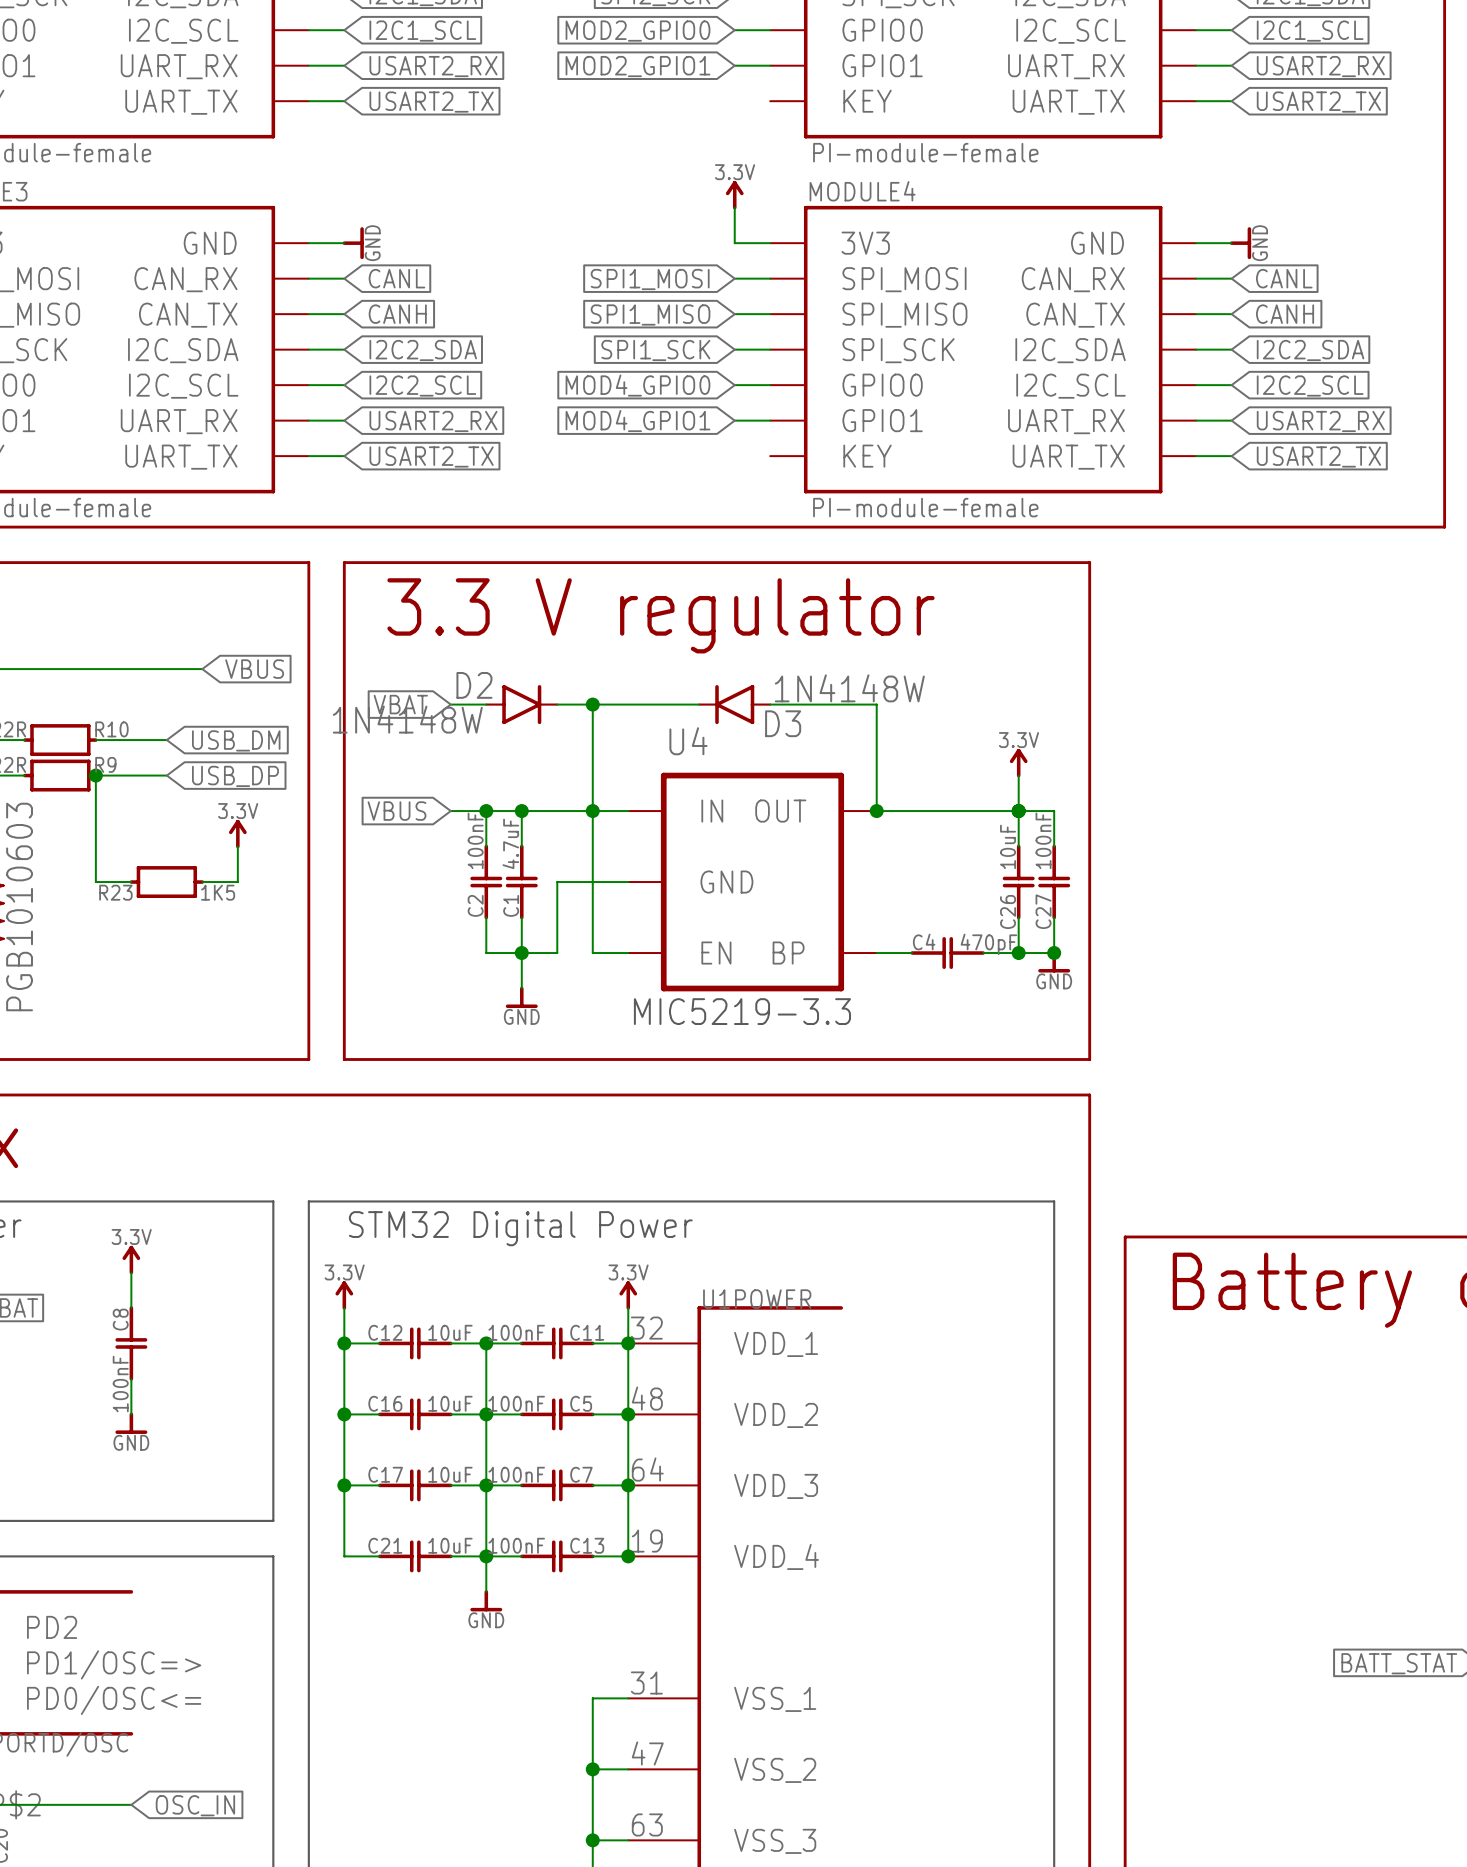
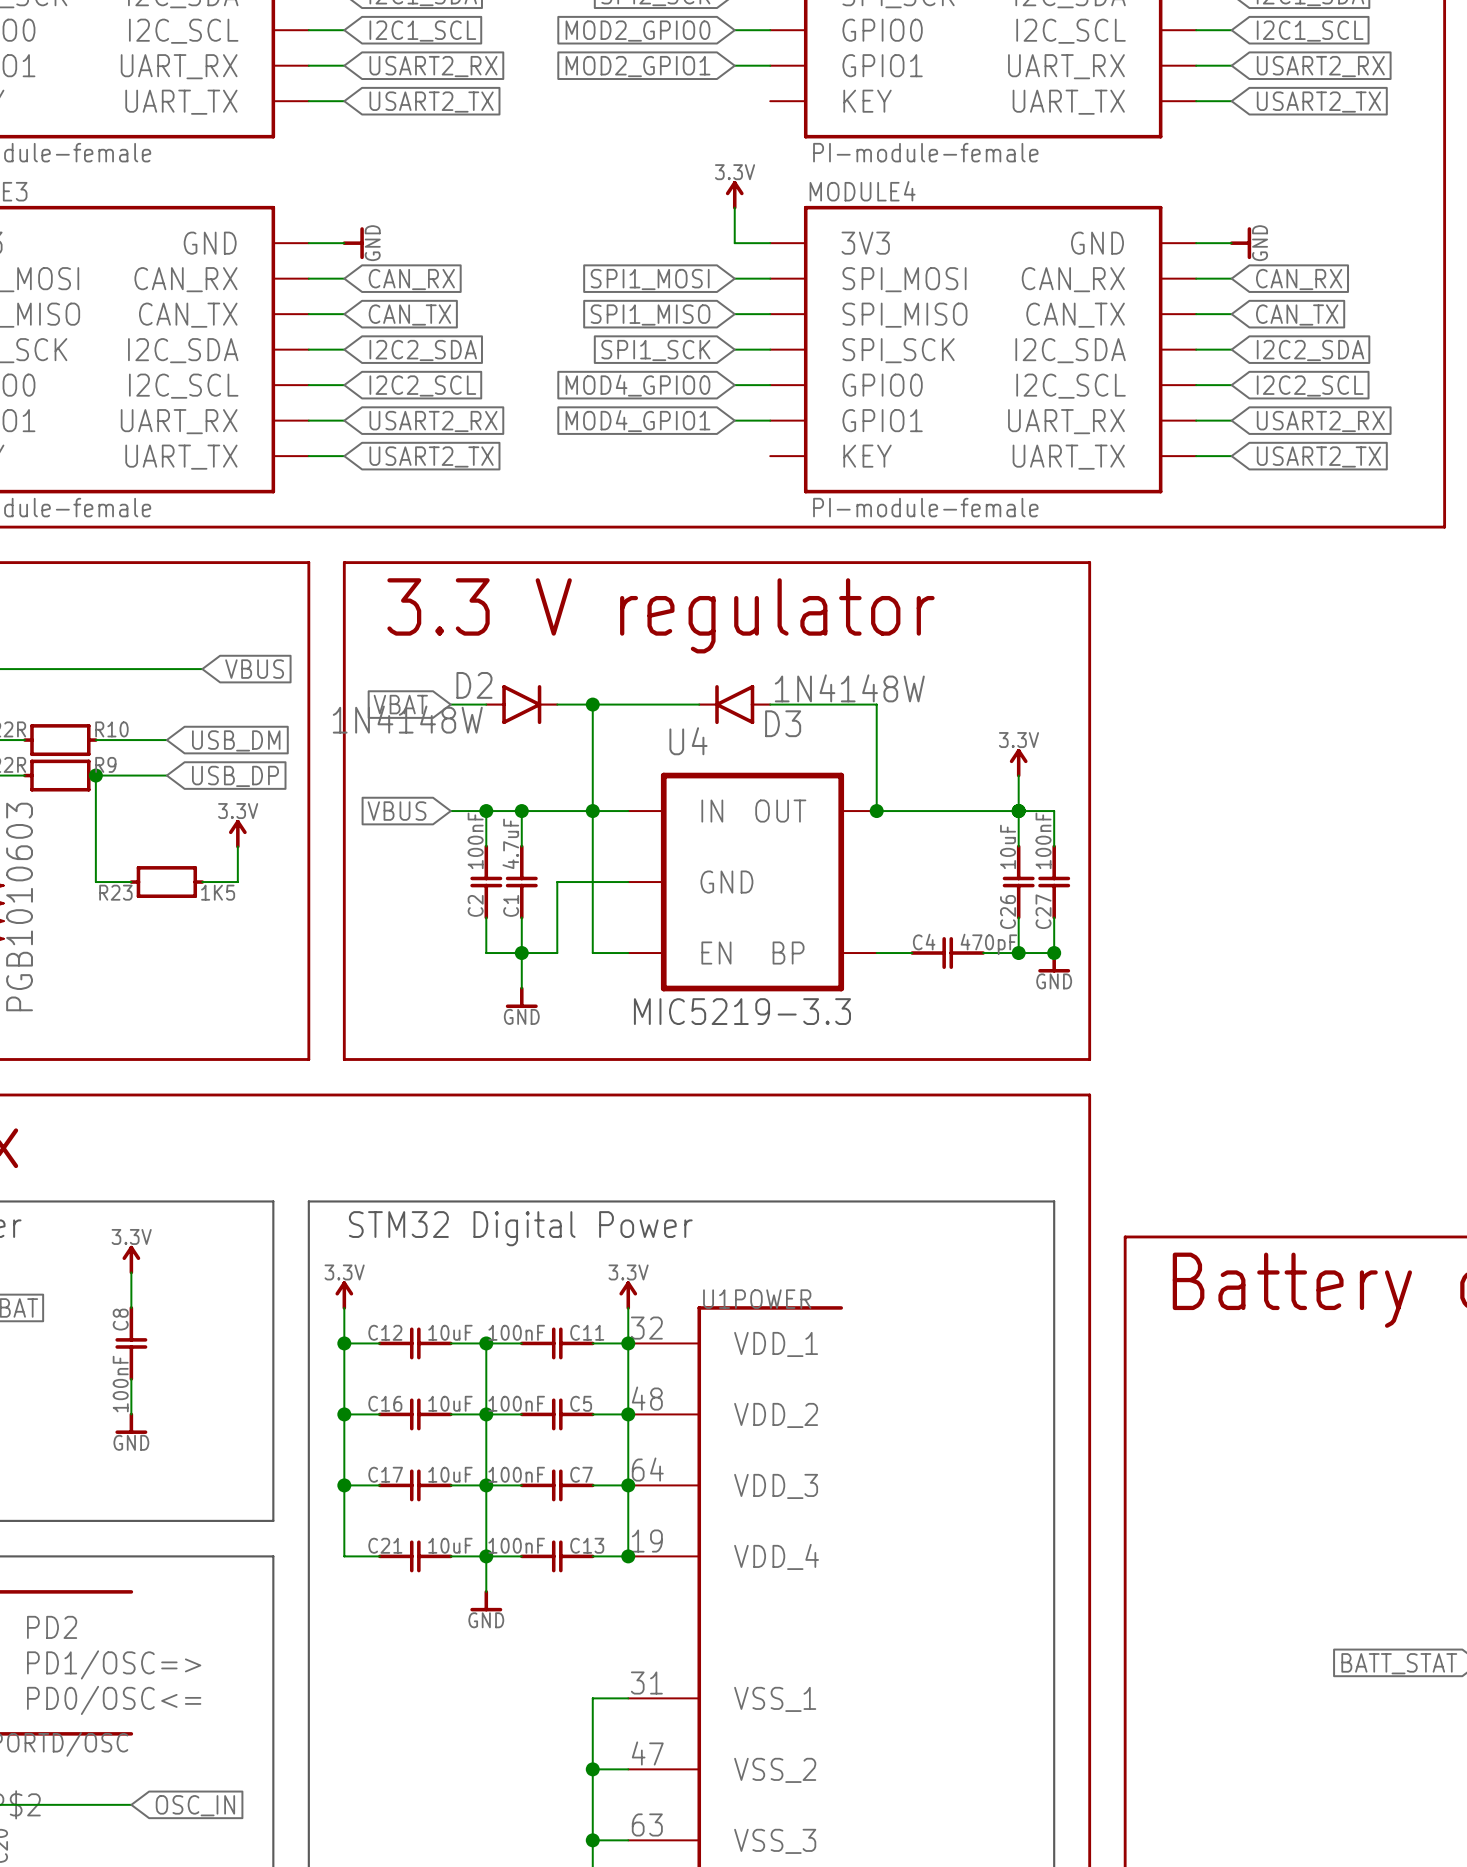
global label: CANL (396, 278) -> CAN_RX (411, 279)
global label: CANL (1284, 278) -> CAN_RX (1299, 279)
global label: CANH (397, 314) -> CAN_TX (409, 314)
global label: CANH (1285, 314) -> CAN_TX (1297, 314)

